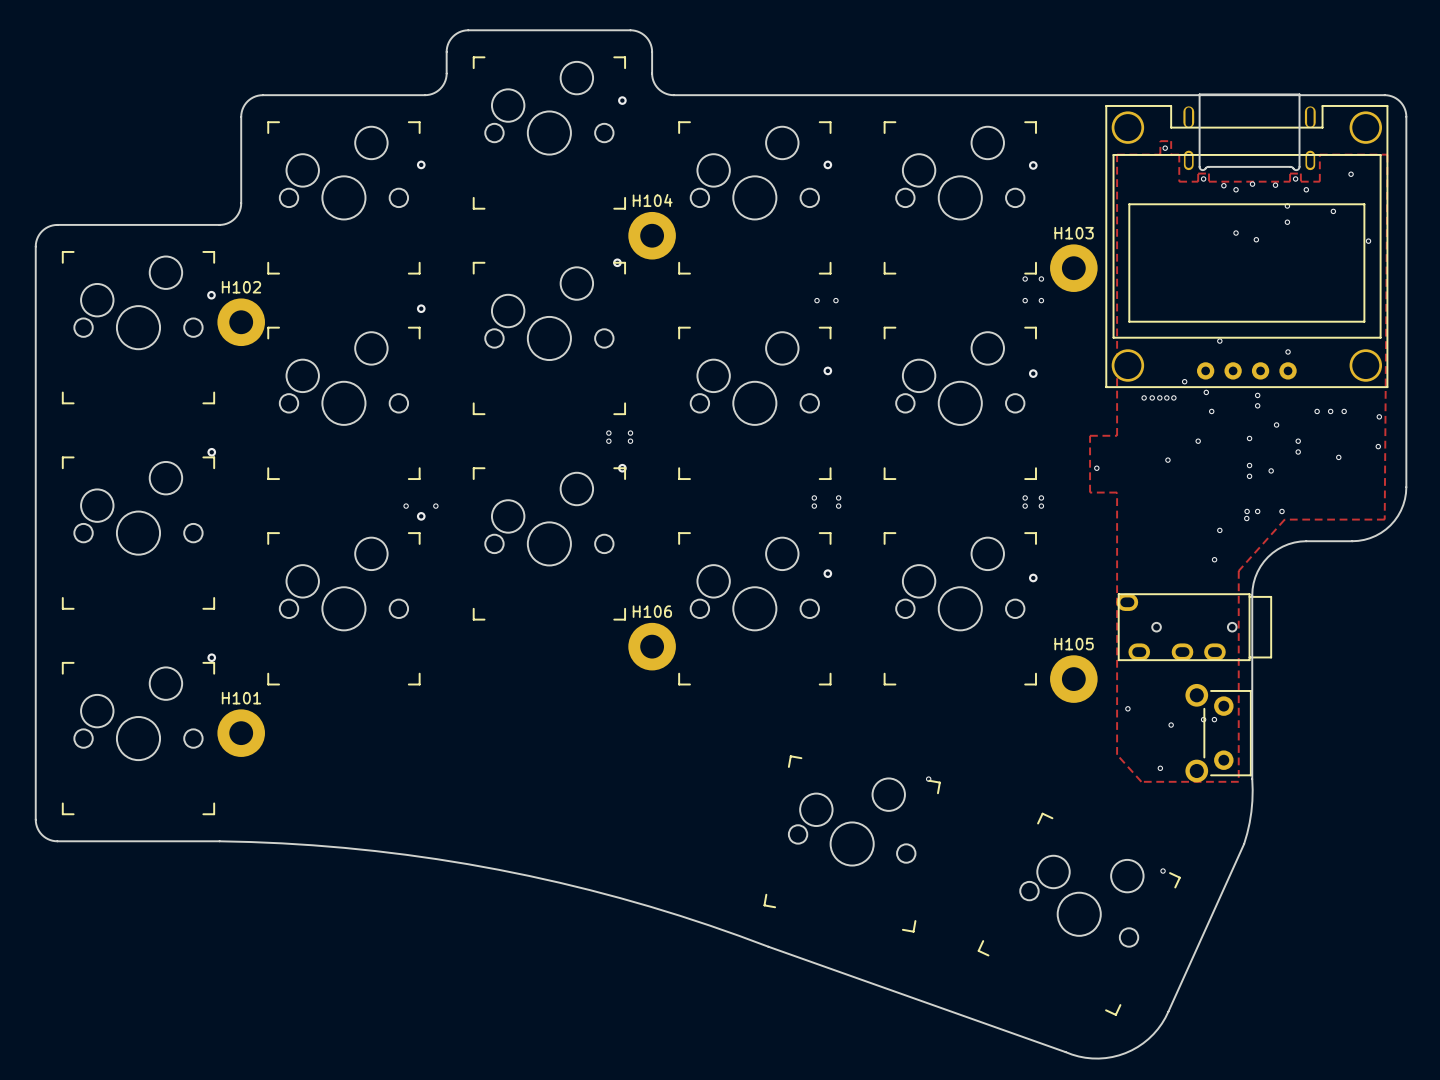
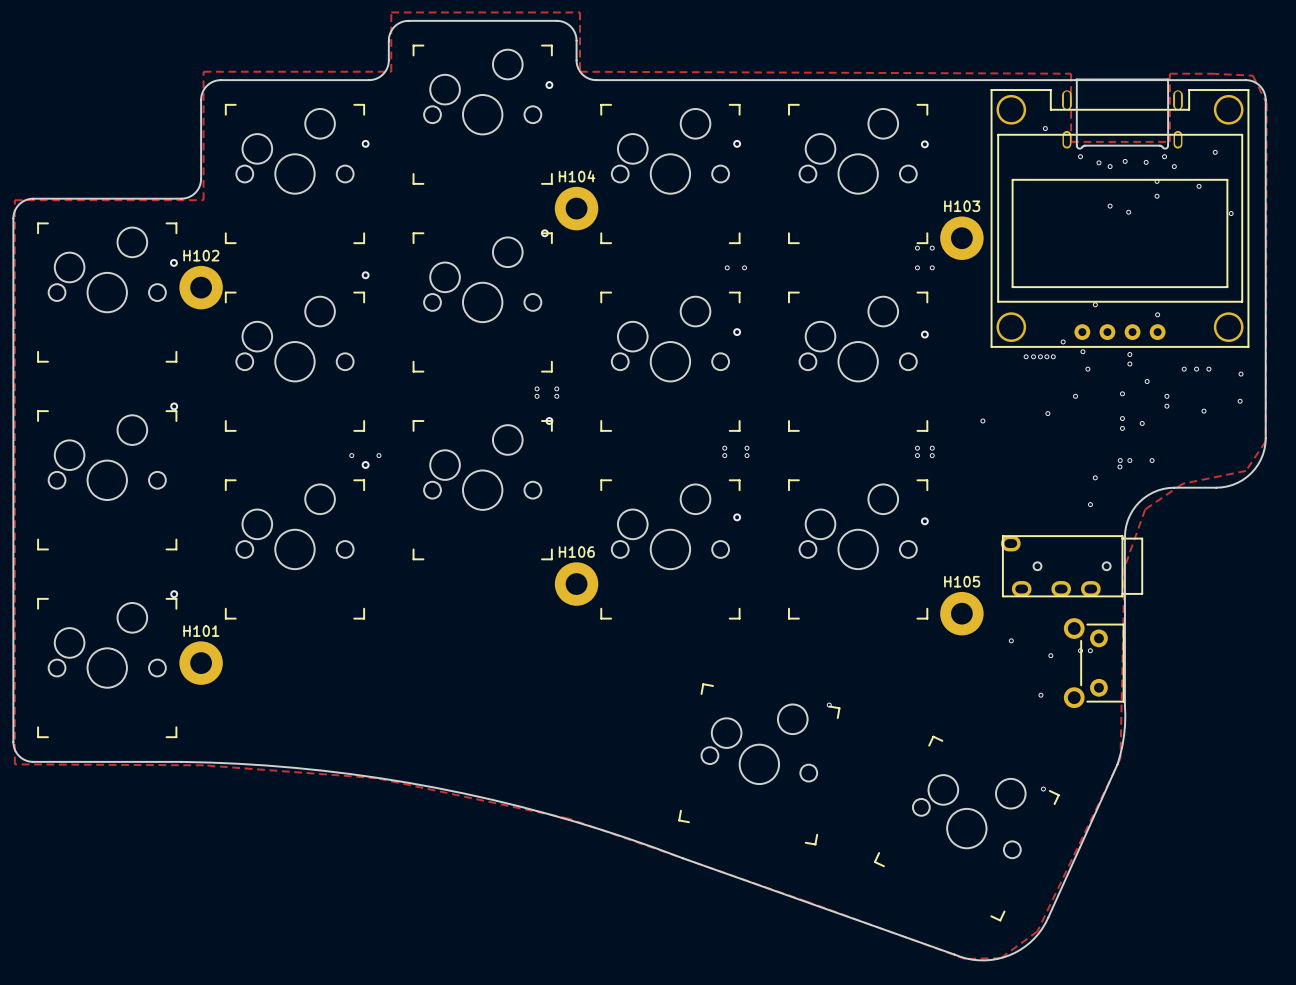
zone outline: none -> (391, 12) (391, 71) (203, 71) (203, 200) (14, 200) (14, 764) (203, 765) (376, 778) (569, 818) (965, 959) (1000, 958) (1037, 931) (1120, 758) (1124, 567) (1145, 509) (1182, 483) (1245, 470) (1265, 441) (1266, 103) (1252, 75) (1169, 73) (1169, 141) (1071, 141) (1071, 73) (580, 71) (580, 12) (391, 12)
zone outline: (1160, 141) (1160, 154) (1117, 154) (1117, 435) (1090, 435) (1090, 492) (1117, 492) (1117, 754) (1141, 781) (1238, 781) (1238, 570) (1284, 519) (1384, 519) (1387, 154) (1319, 154) (1319, 181) (1300, 181) (1300, 173) (1290, 173) (1290, 181) (1209, 181) (1209, 173) (1198, 173) (1198, 181) (1179, 181) (1179, 154) (1171, 154) (1171, 141) (1160, 141) -> none

